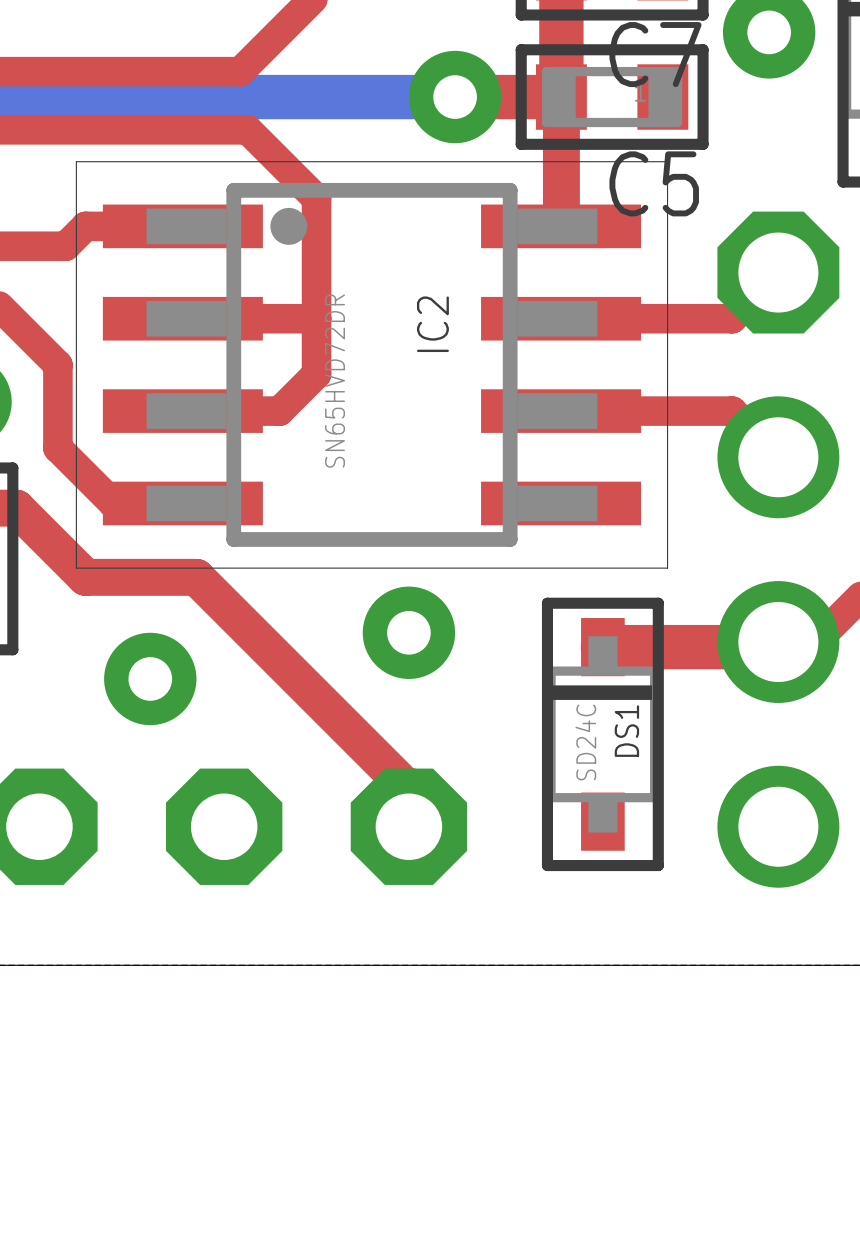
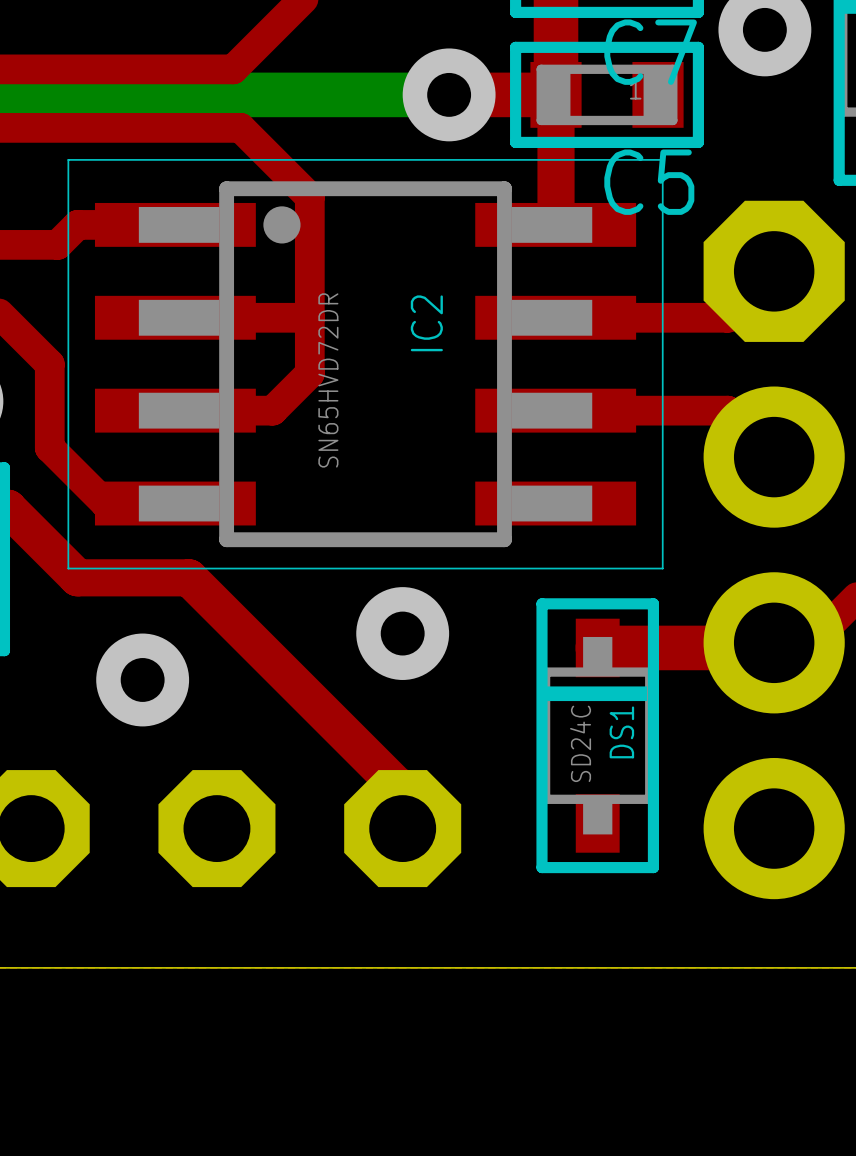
part footprint: [717, 211, 840, 888] -> [703, 200, 845, 900]

